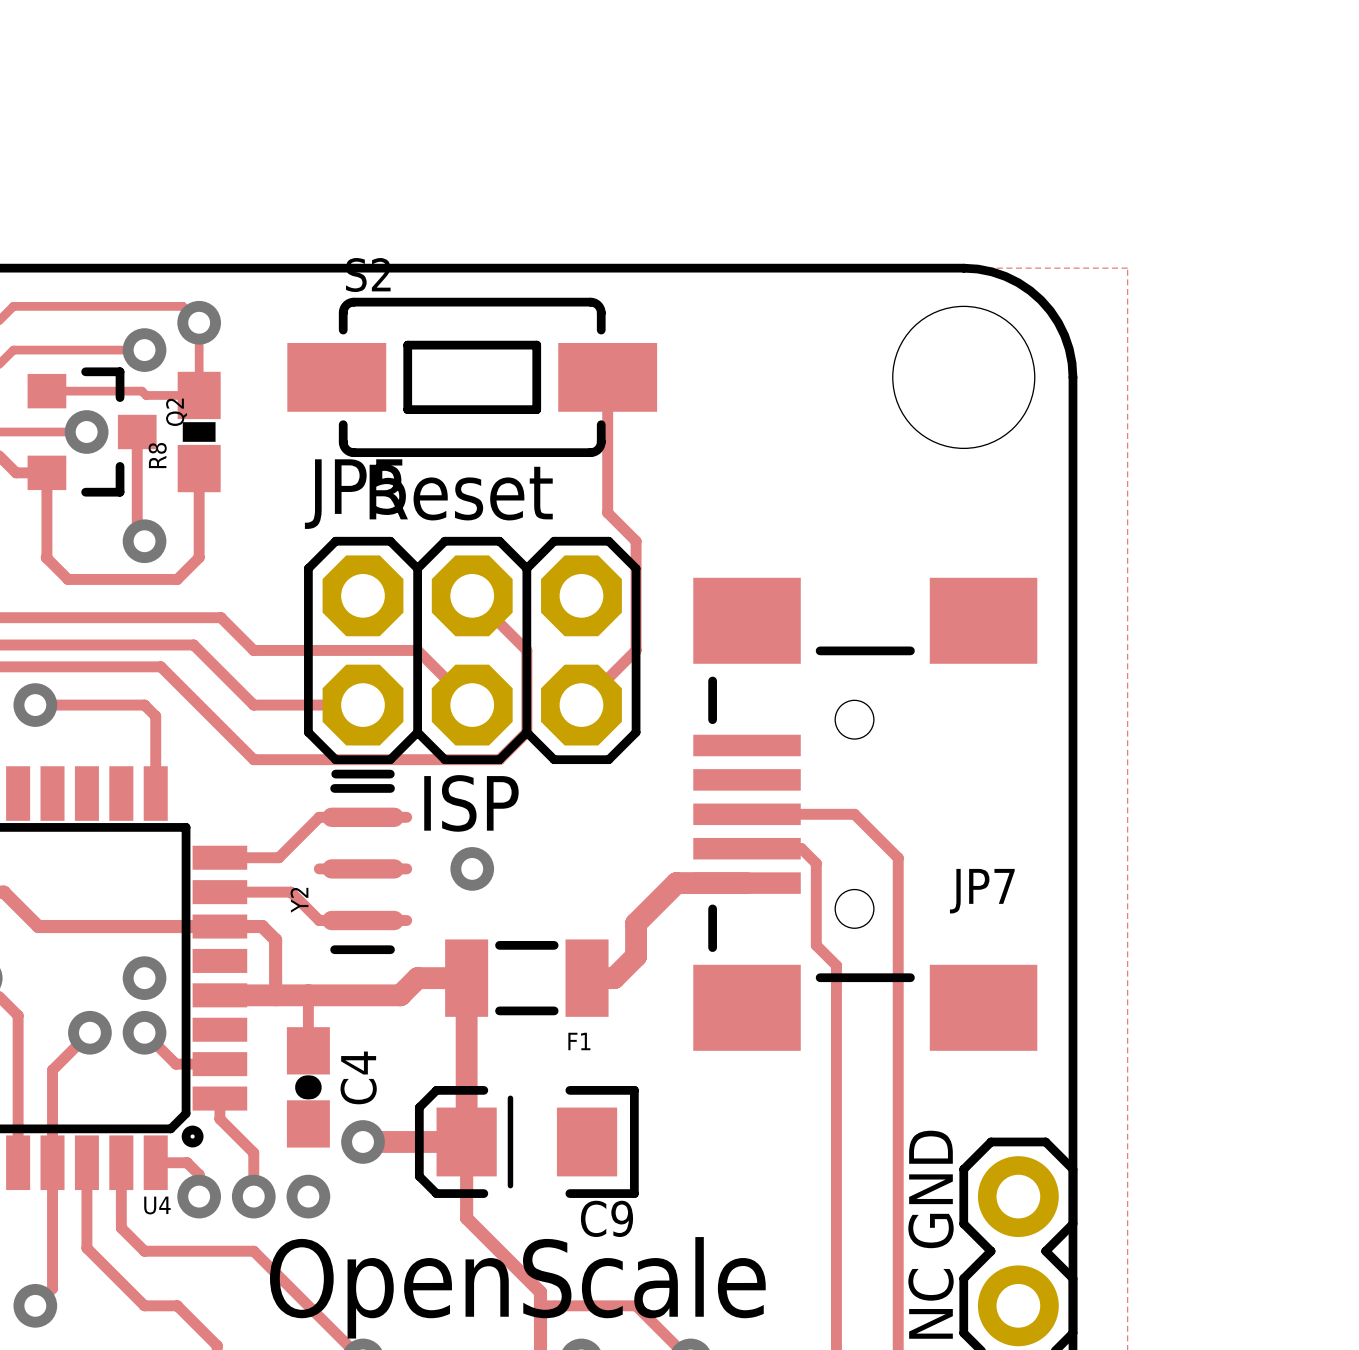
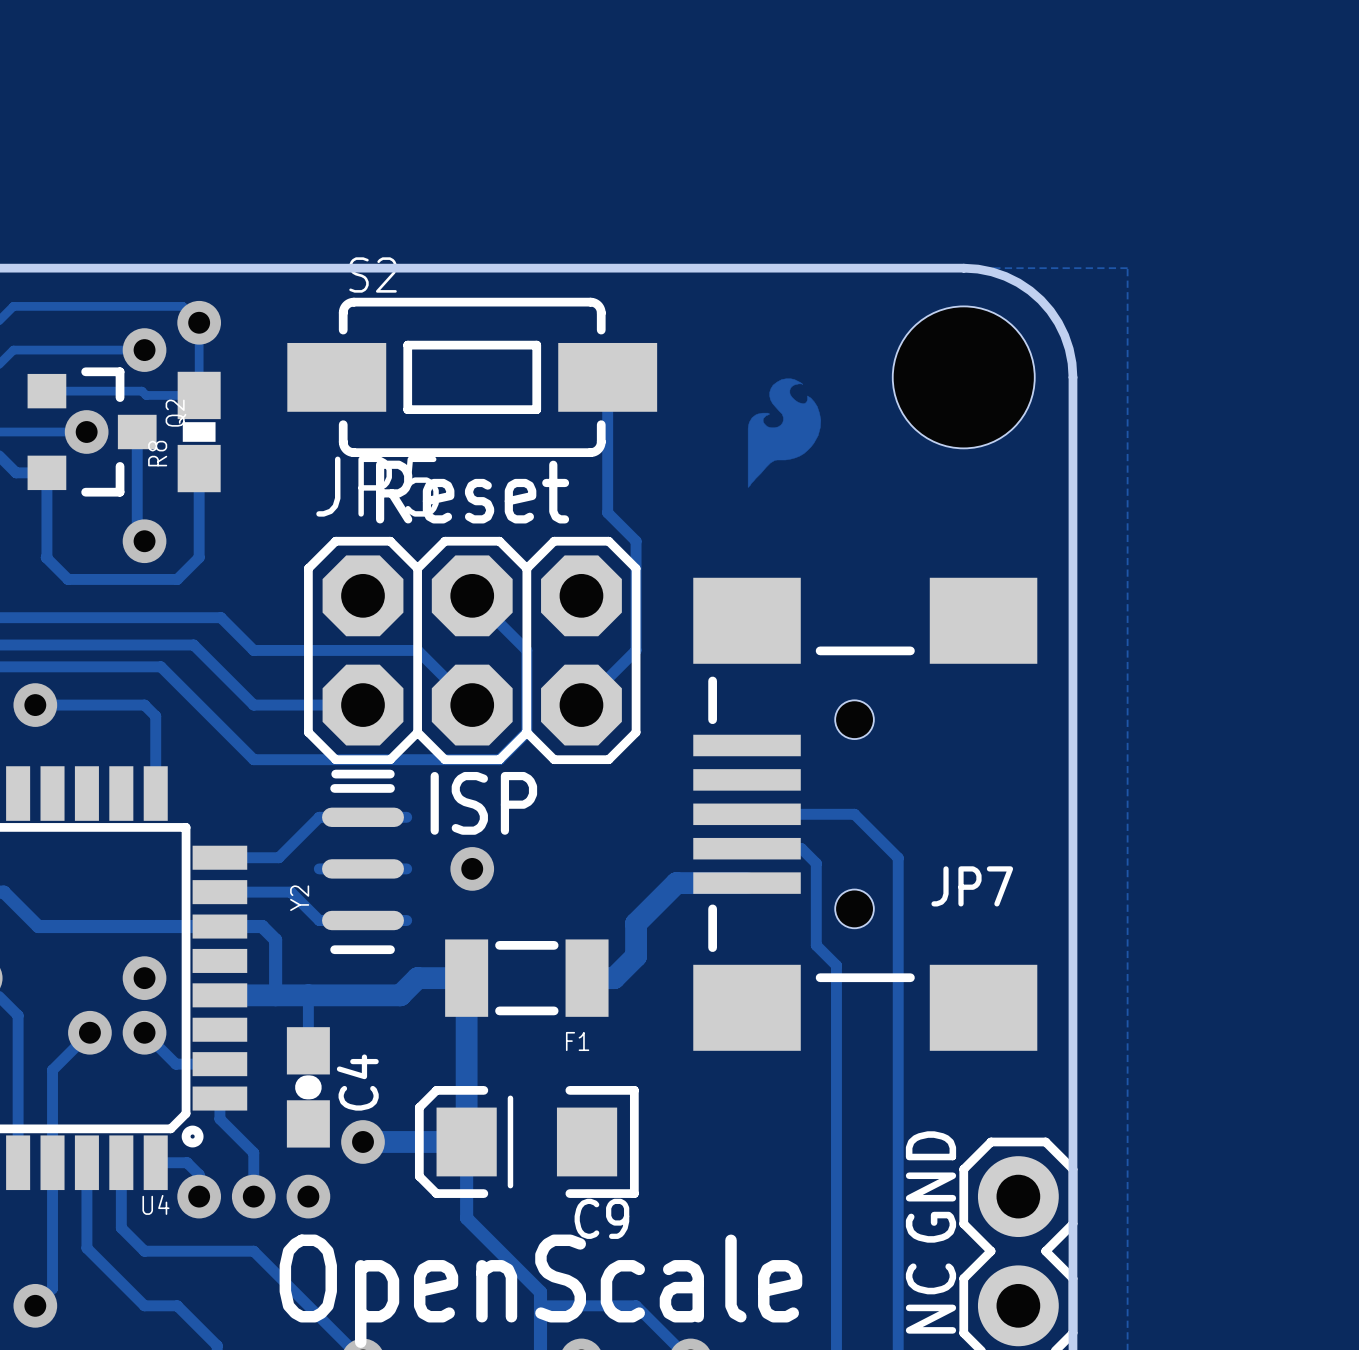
drawing: none -> [747, 378, 822, 488]

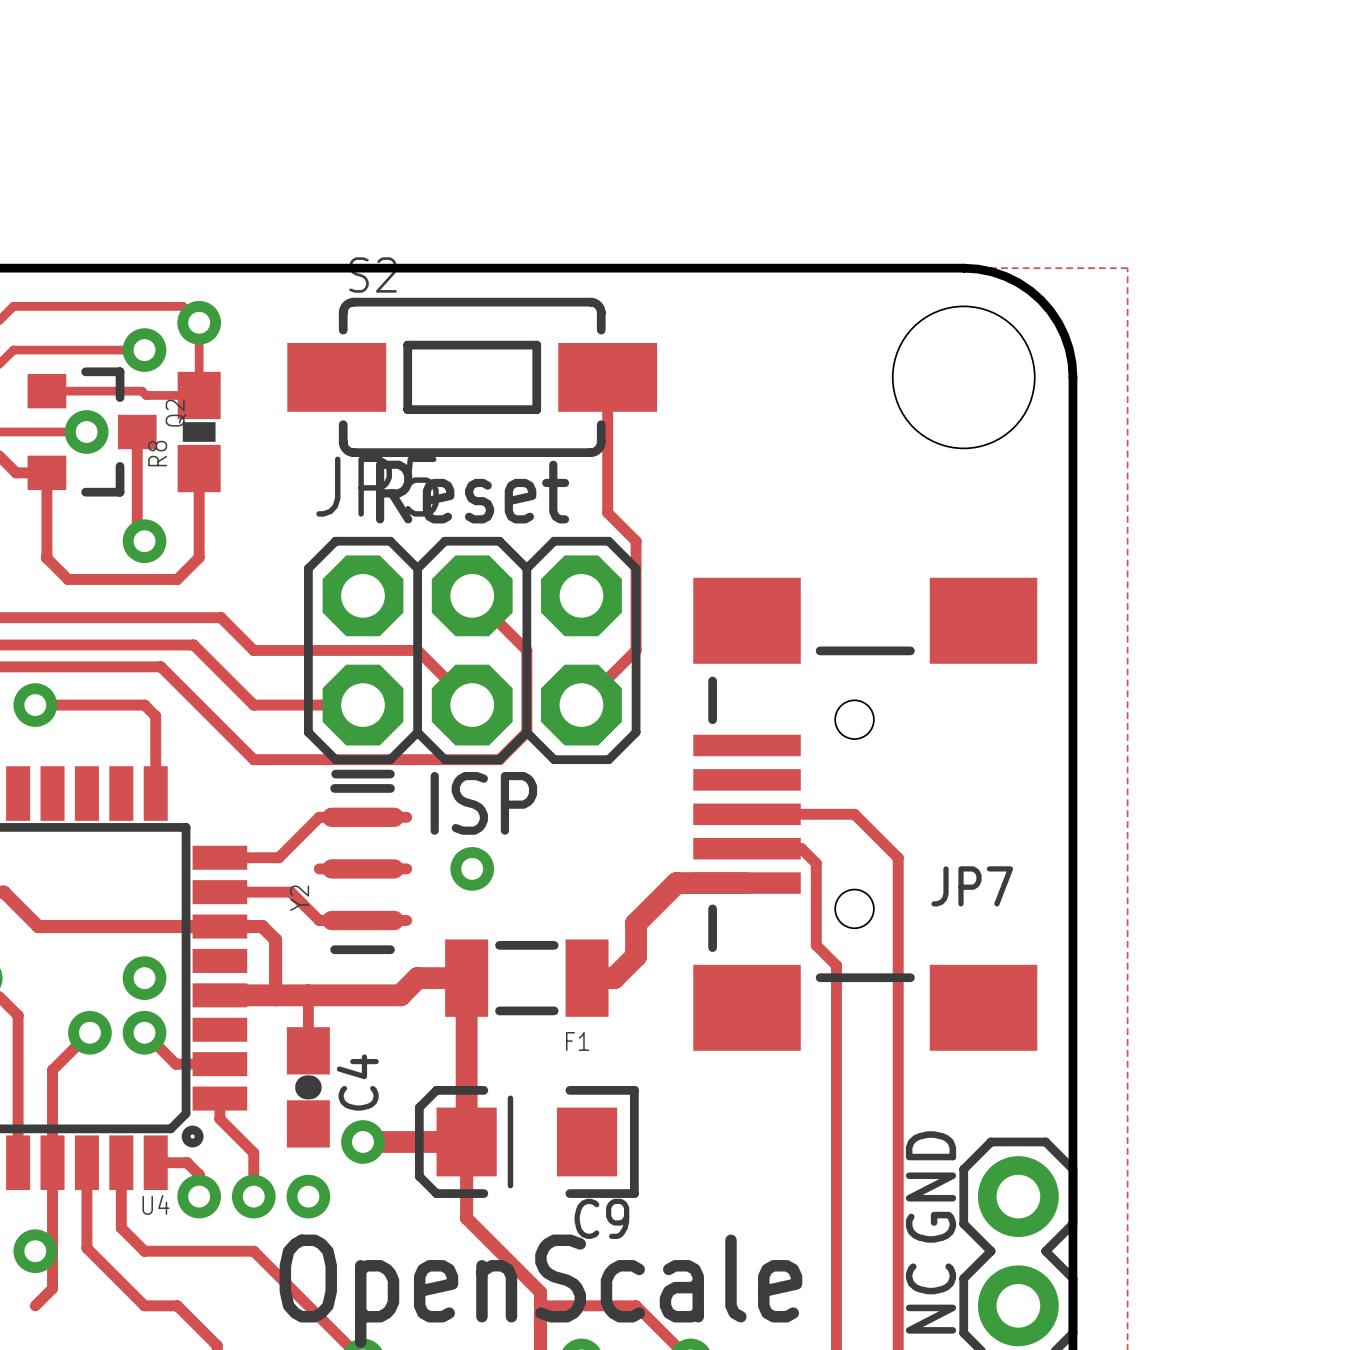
drawing: [747, 378, 822, 488] -> none
via position: (35, 1305) -> (35, 1251)

